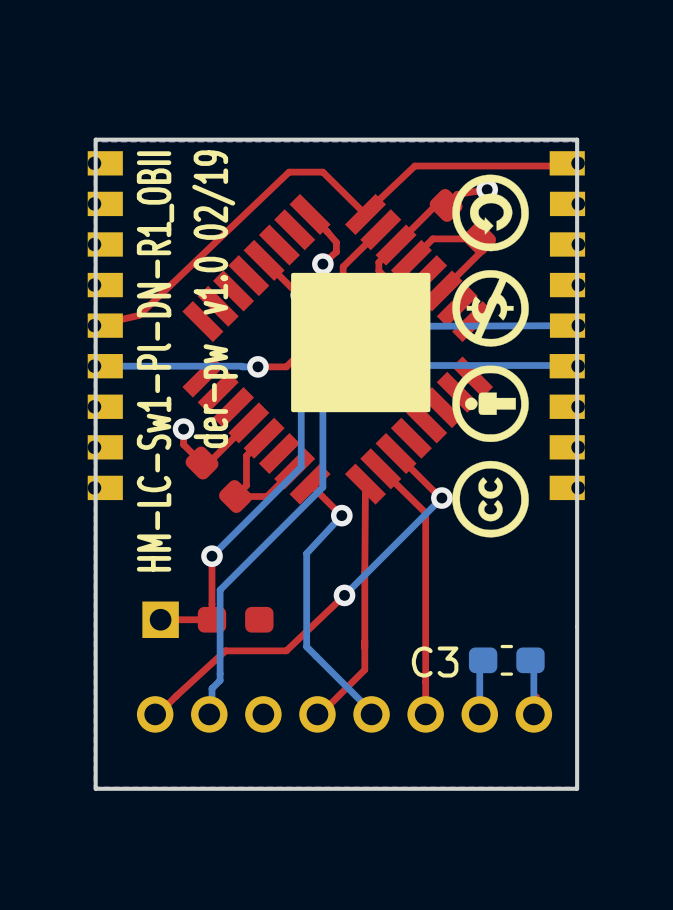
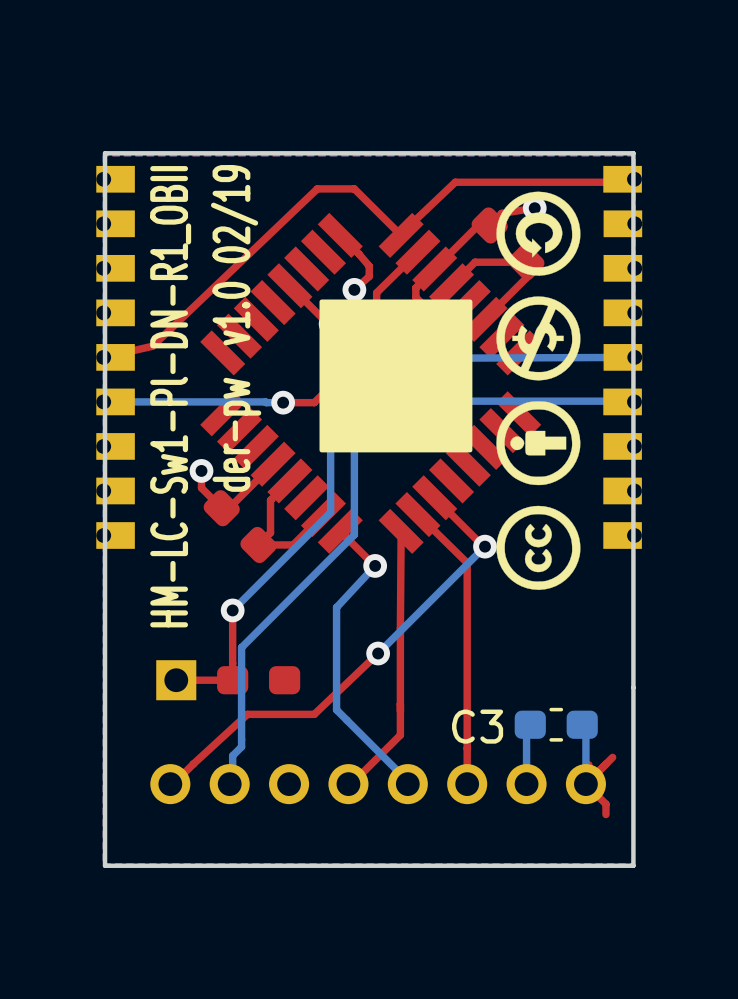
top track: none -> (612, 757) (585, 784) (605, 804) (605, 814)

